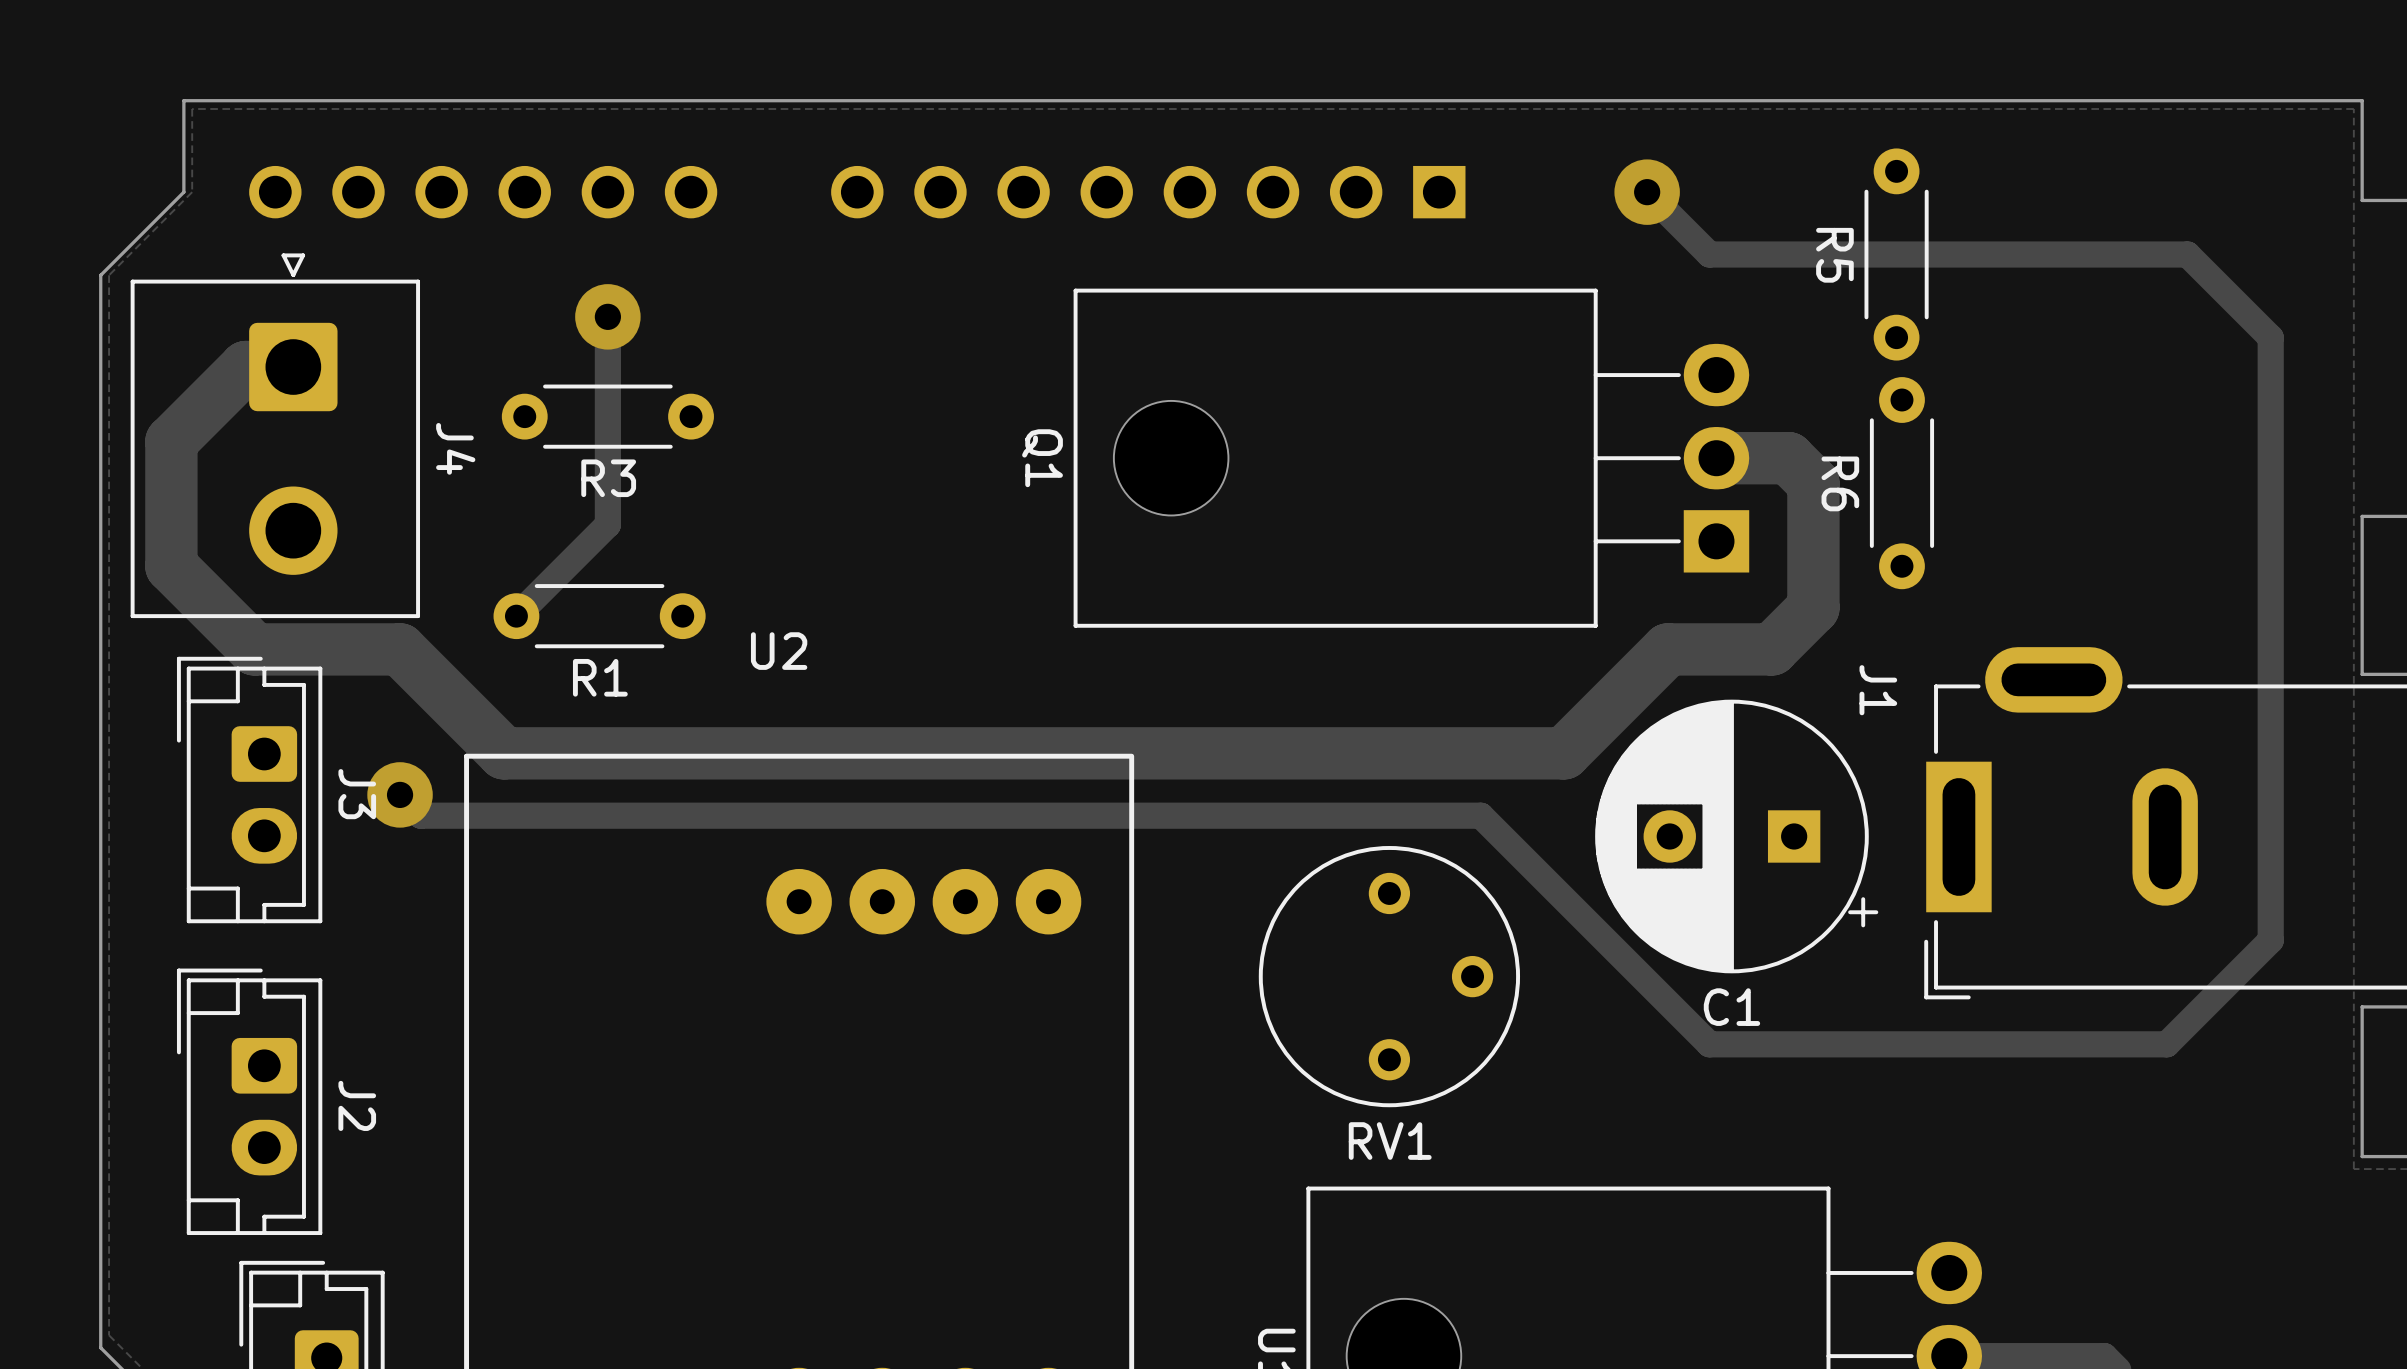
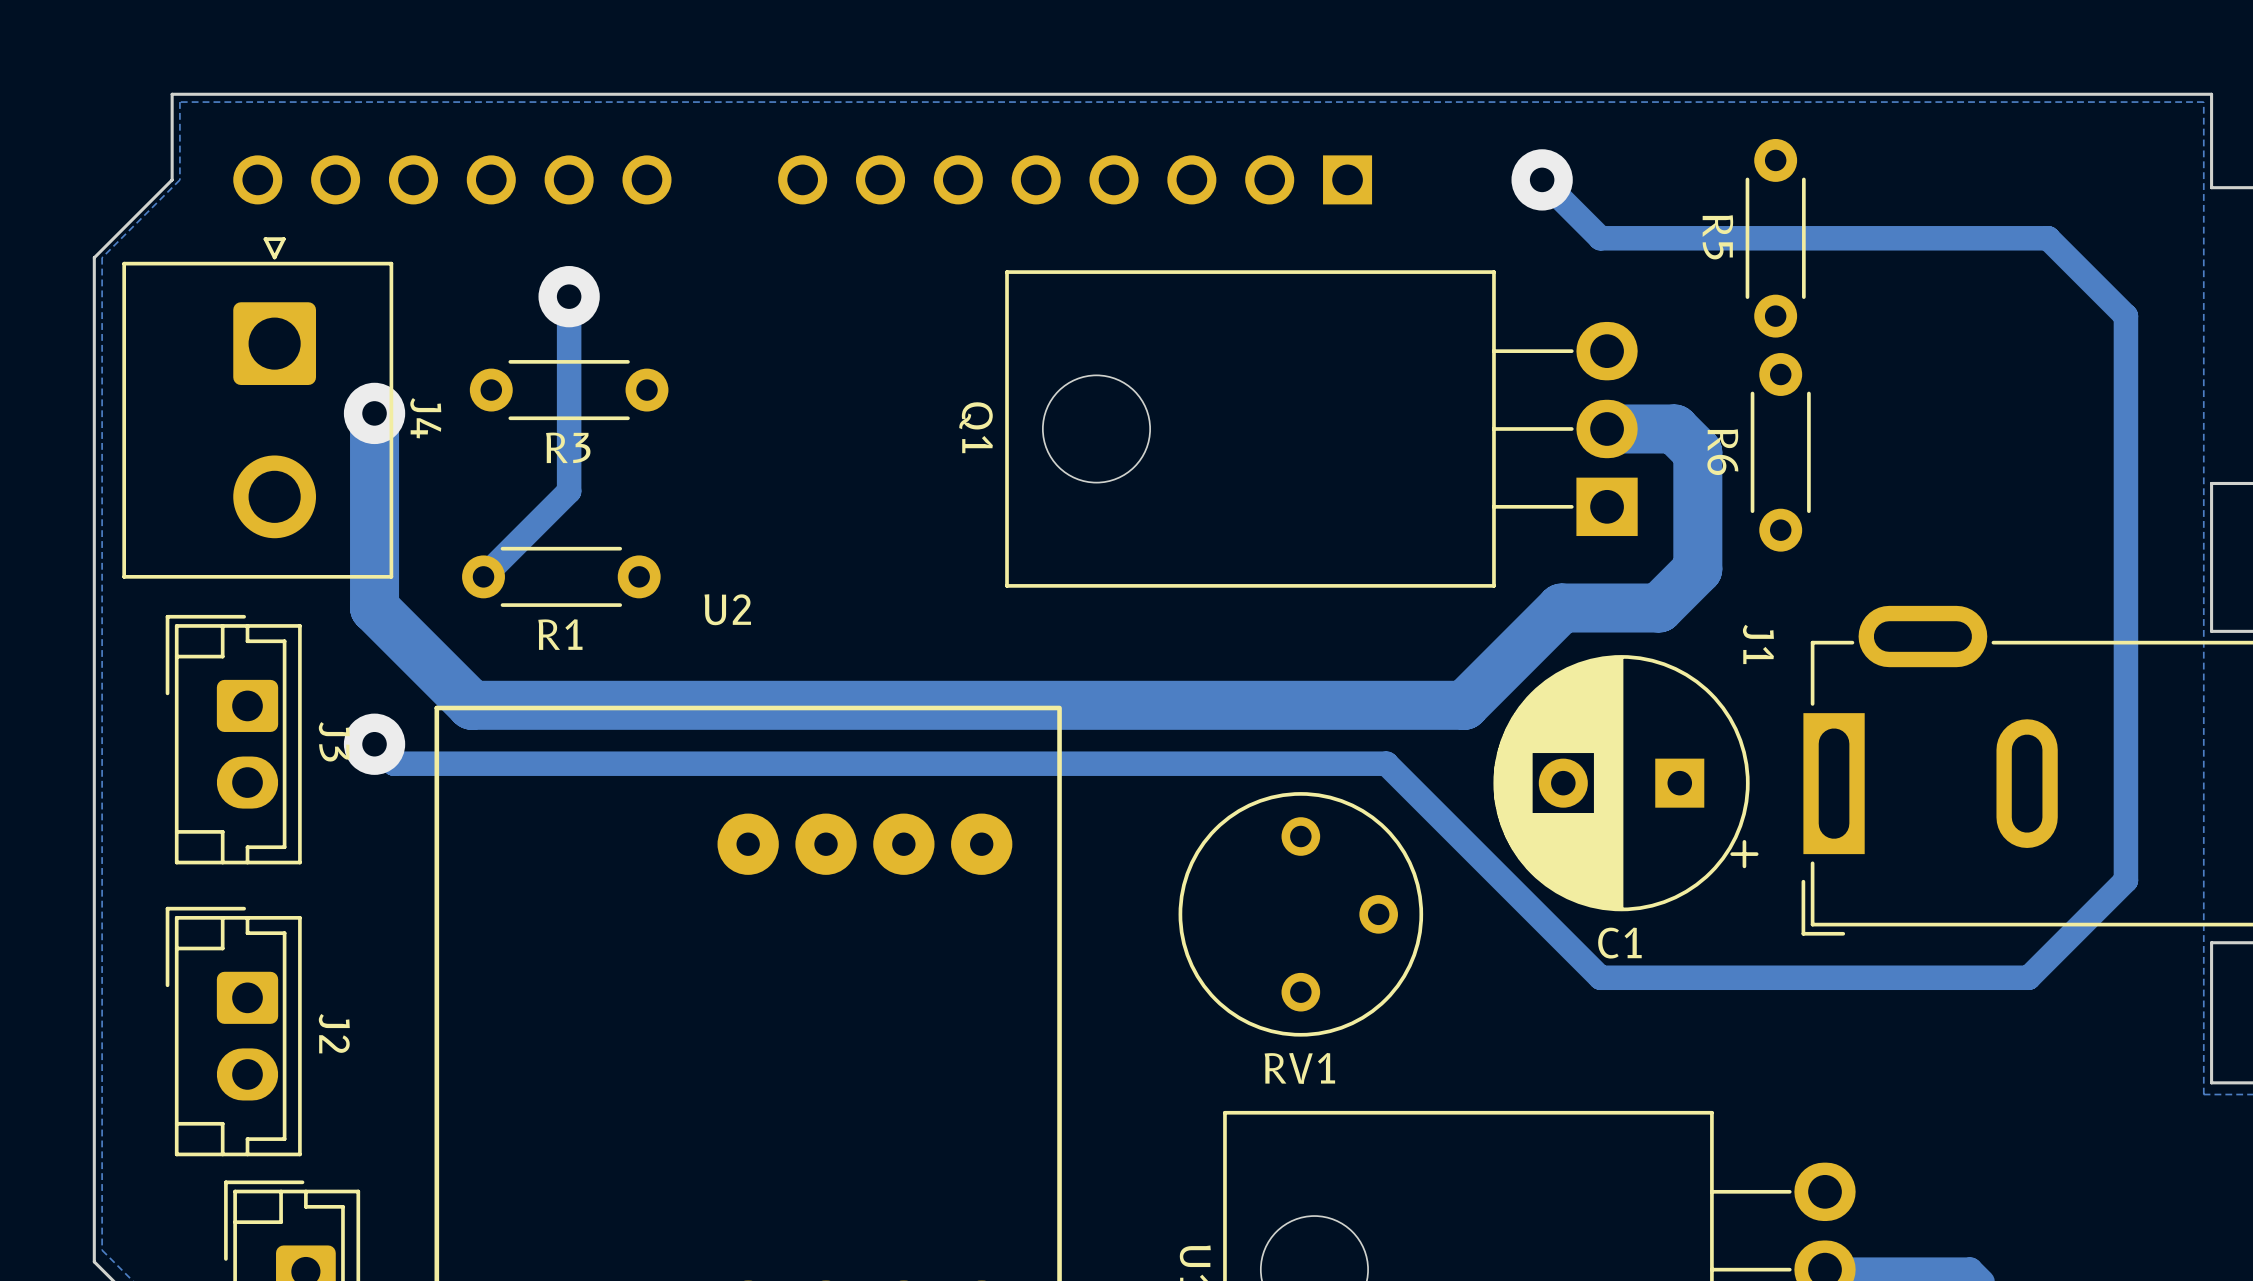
track: (293, 367) (245, 367) (171, 441) (171, 566) (254, 649) (400, 649) -> (374, 413) (374, 608)
via: none -> (374, 413)

